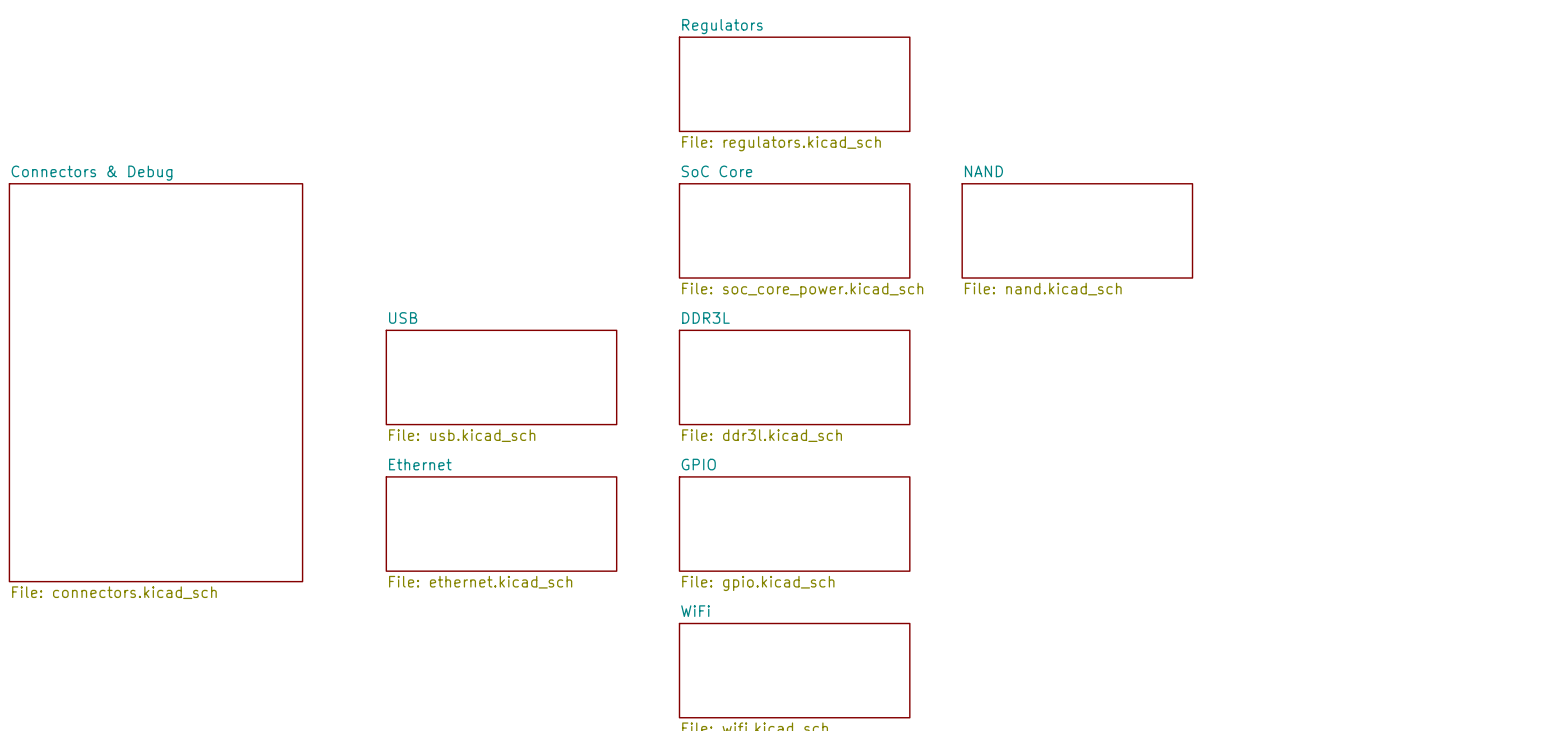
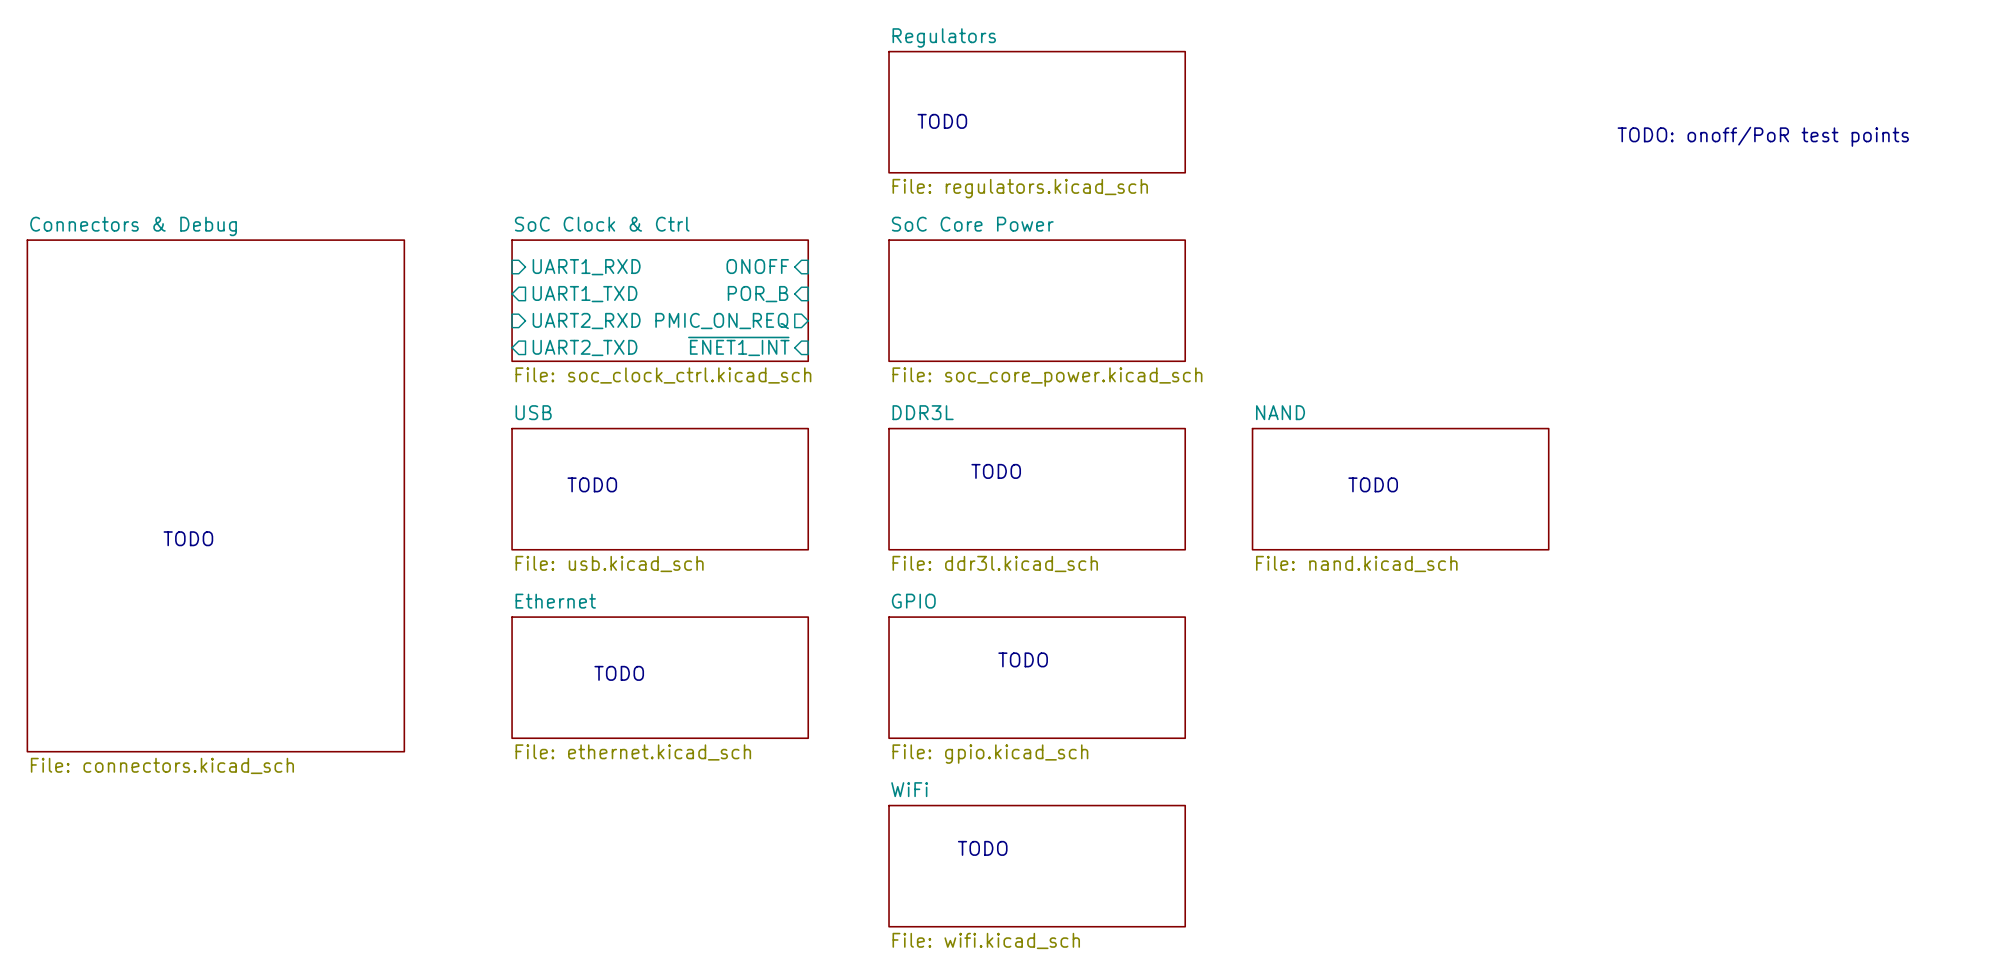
text: none -> TODO (942, 121)
text: none -> TODO: onoff/PoR test points (1763, 136)
sheet SoC Core name: SoC Core (716, 171) -> SoC Core Power (972, 224)
sheet pin: none -> UART1_RXD (586, 267)
sheet pin: none -> ONOFF (757, 266)
sheet pin: none -> UART1_TXD (585, 294)
sheet pin: none -> POR_B (758, 294)
sheet SoC Clock & Ctrl: none -> File: soc_clock_ctrl.kicad_sch (660, 300)
sheet NAND position: (1077, 230) -> (1400, 489)
sheet pin: none -> UART2_RXD (586, 321)
sheet pin: none -> PMIC_ON_REQ (722, 321)
sheet pin: none -> ~{ENET1_INT} (738, 346)
sheet pin: none -> UART2_TXD (585, 347)
text: none -> TODO (996, 471)
text: none -> TODO (592, 484)
text: none -> TODO (1373, 484)
text: none -> TODO (188, 538)
text: none -> TODO (1023, 659)
text: none -> TODO (619, 673)
text: none -> TODO (982, 848)

